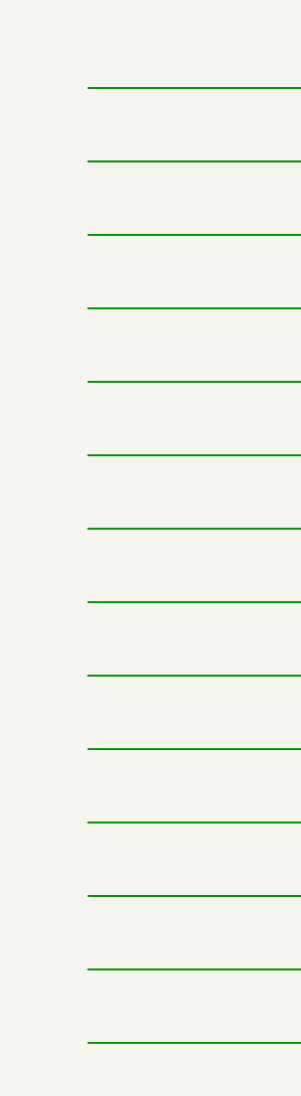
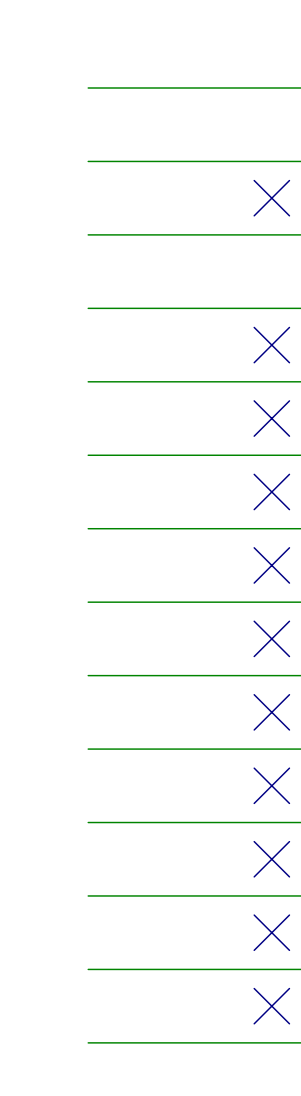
no-connect mark: none -> (271, 198)
no-connect mark: none -> (271, 345)
no-connect mark: none -> (271, 418)
no-connect mark: none -> (271, 491)
no-connect mark: none -> (271, 565)
no-connect mark: none -> (271, 638)
no-connect mark: none -> (271, 712)
no-connect mark: none -> (271, 785)
no-connect mark: none -> (271, 859)
no-connect mark: none -> (271, 932)
no-connect mark: none -> (271, 1006)

